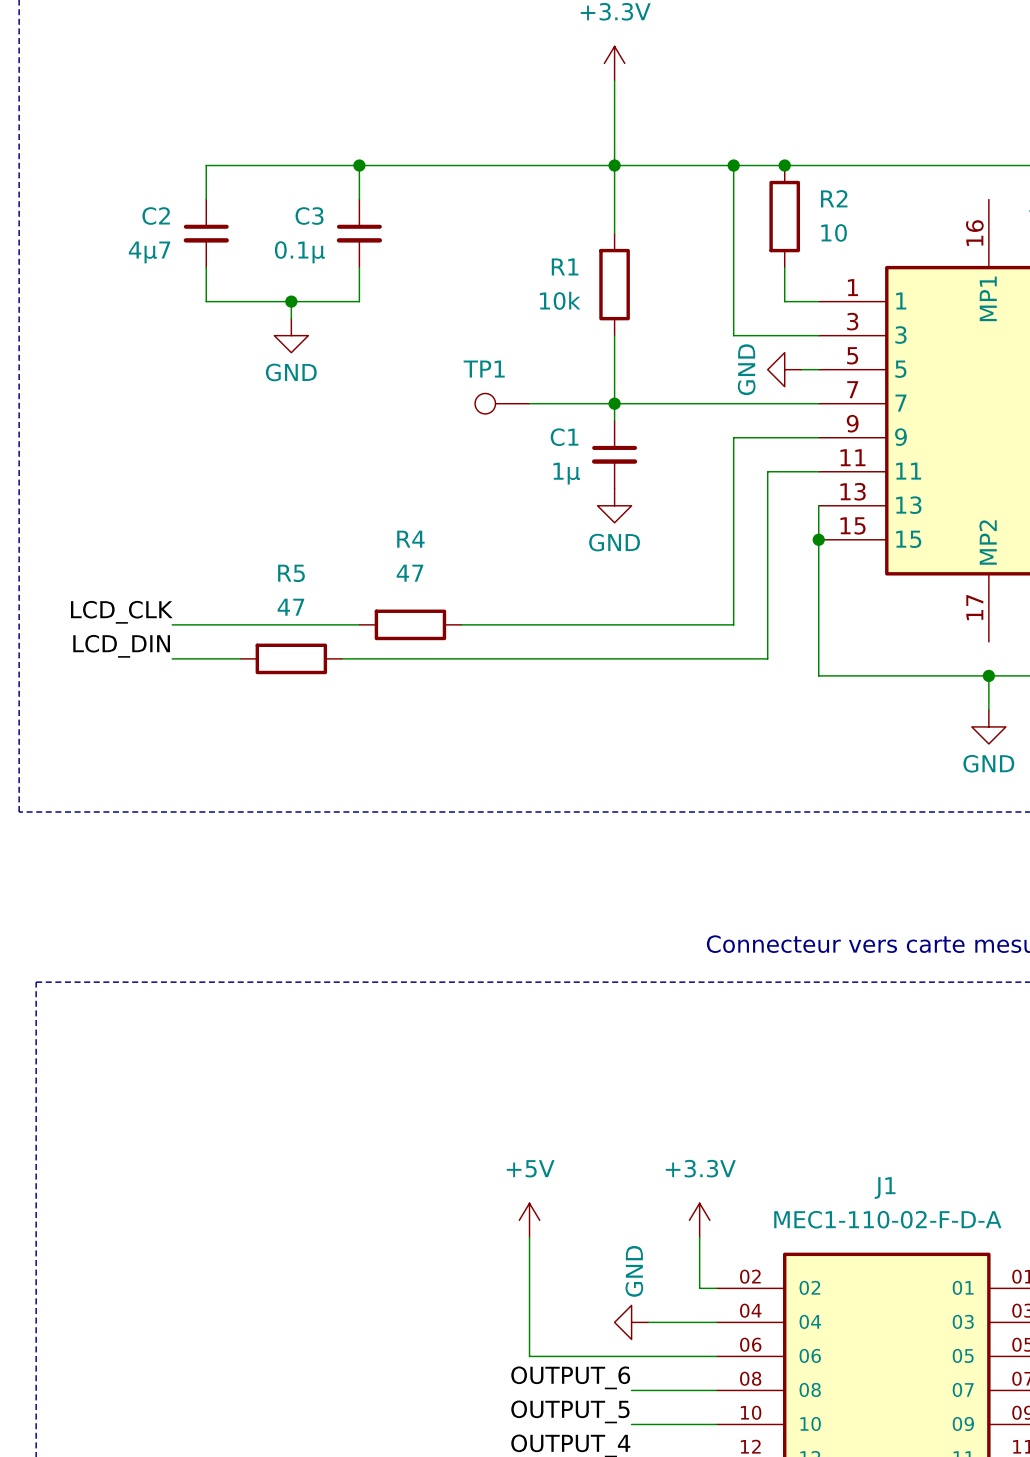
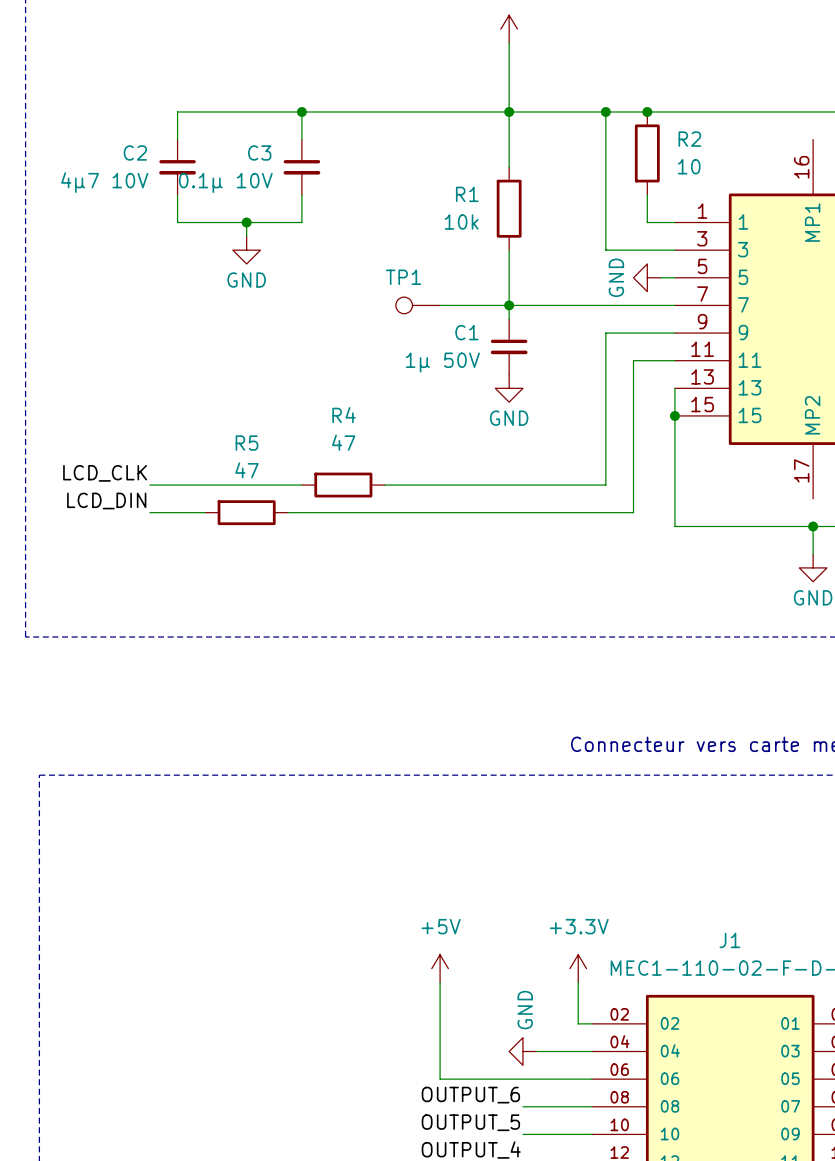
C2 value: 4µ7 (149, 252) -> 4µ7 10V (104, 182)
C3 value: 0.1µ (299, 252) -> 0.1µ 10V (225, 182)
C1 value: 1µ (566, 473) -> 1µ 50V (442, 362)

